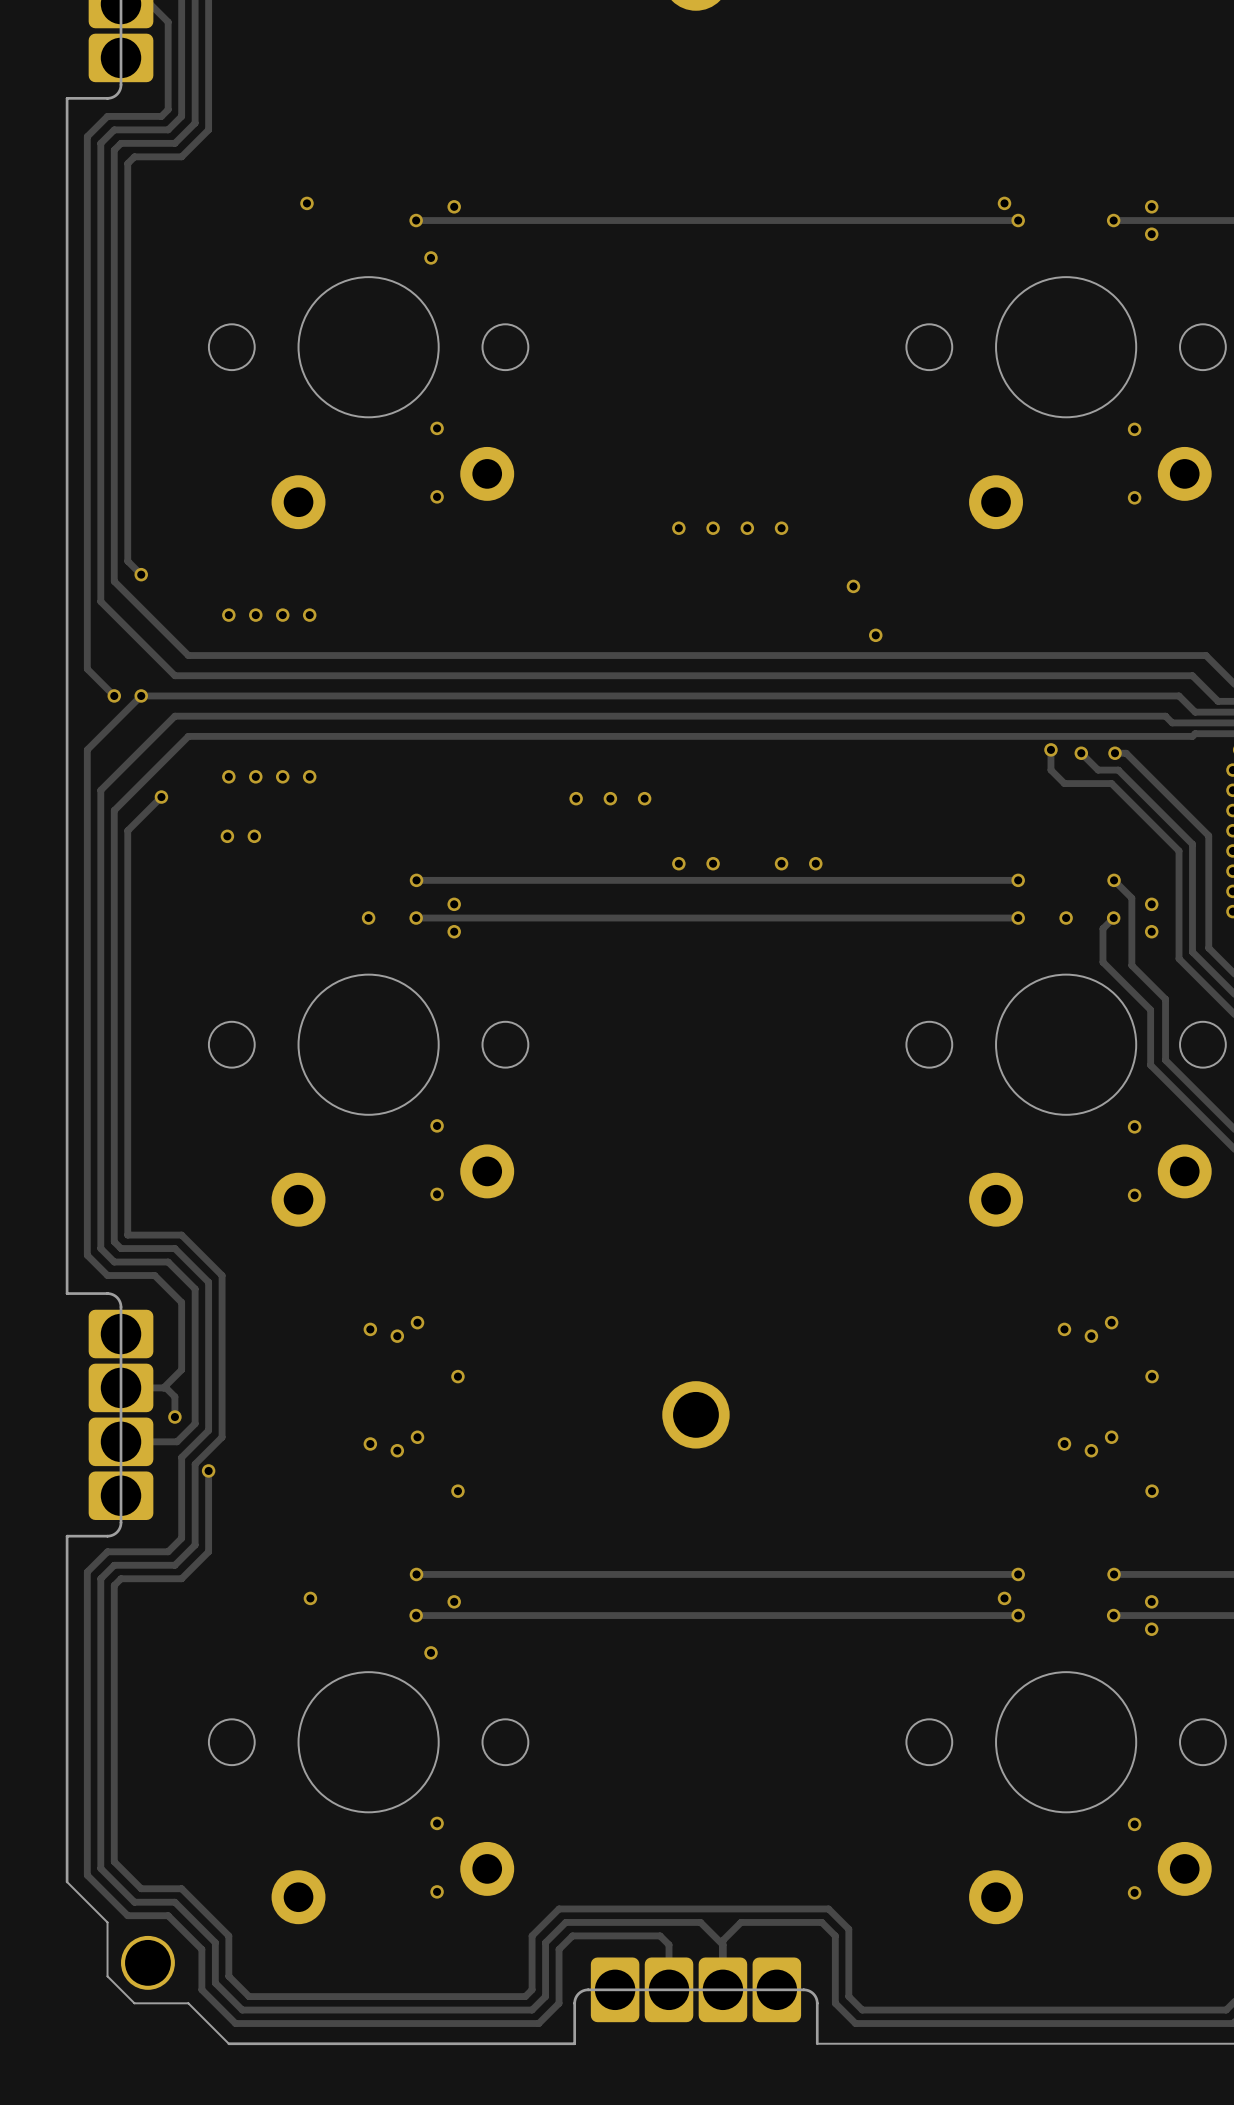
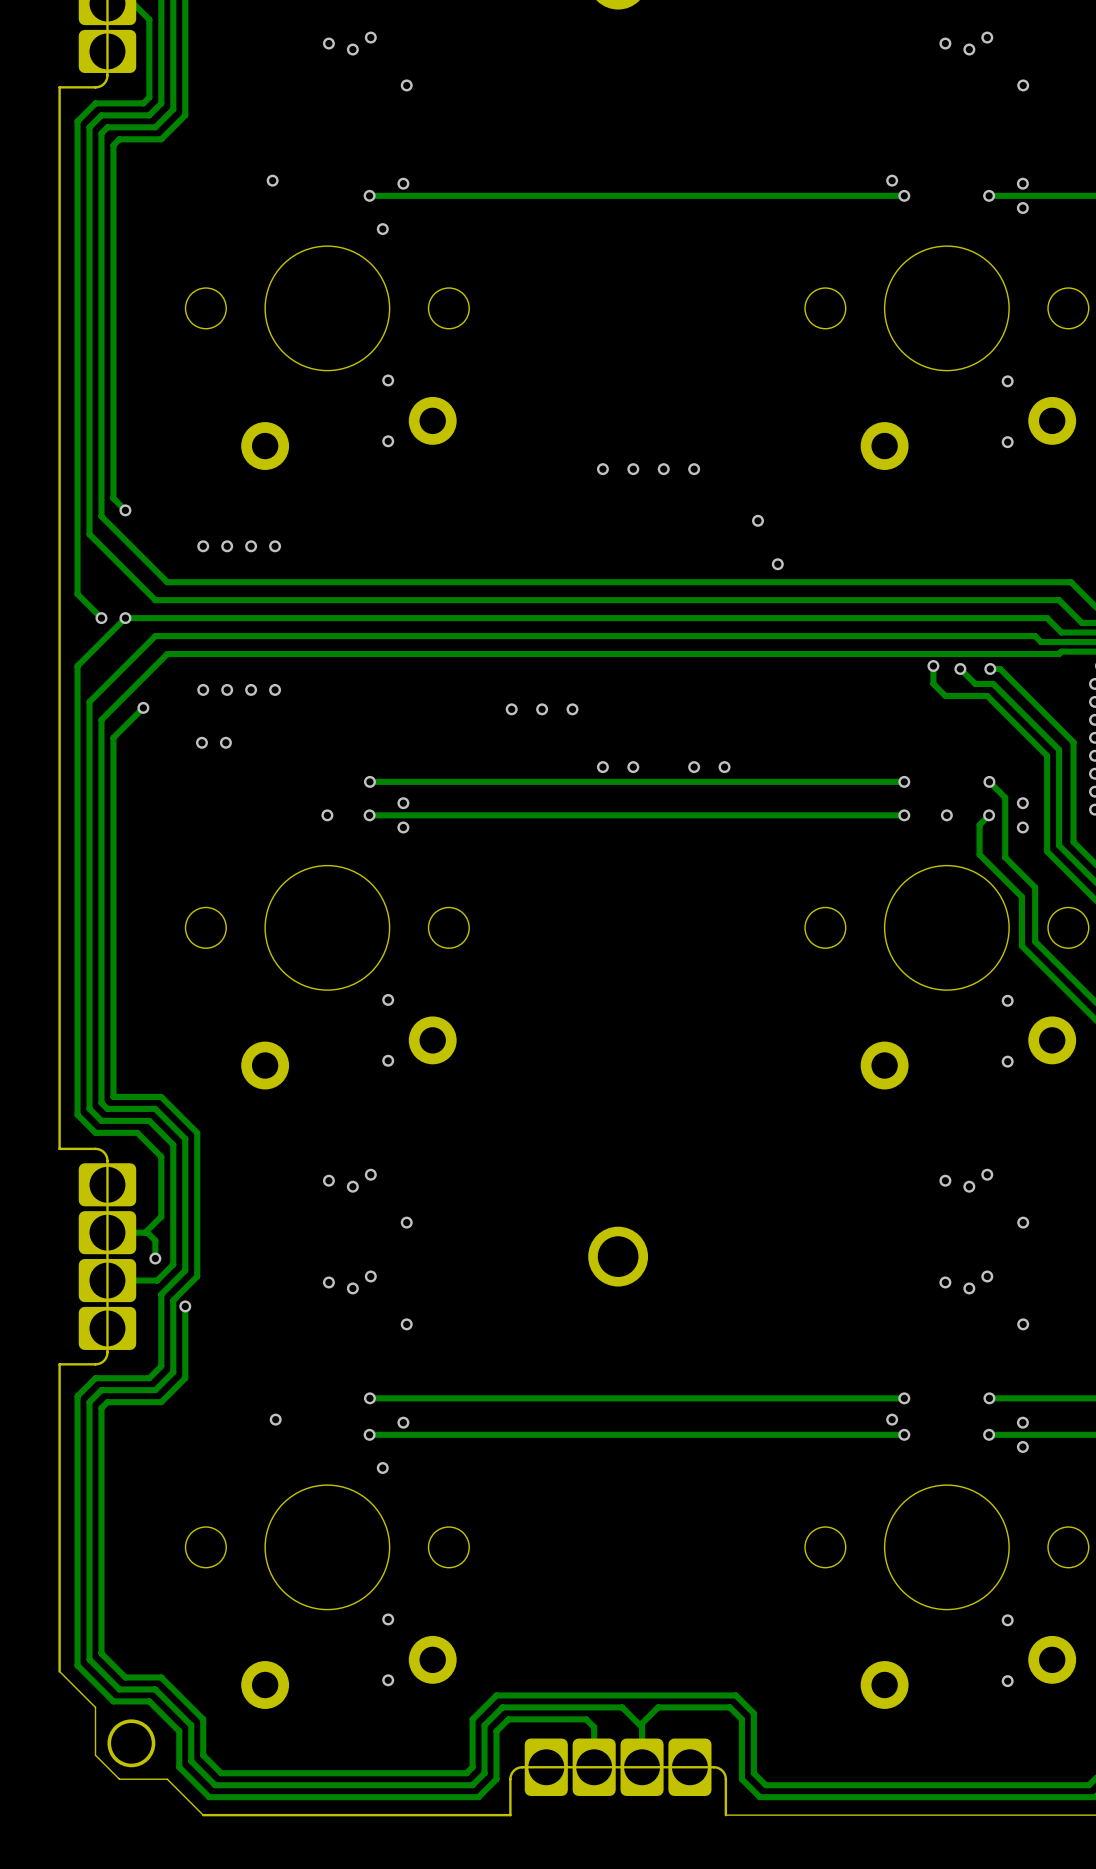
via: none -> (370, 37)
via: none -> (987, 37)
via: none -> (328, 43)
via: none -> (945, 43)
via: none -> (352, 49)
via: none -> (969, 49)
via: none -> (406, 85)
via: none -> (1023, 85)

